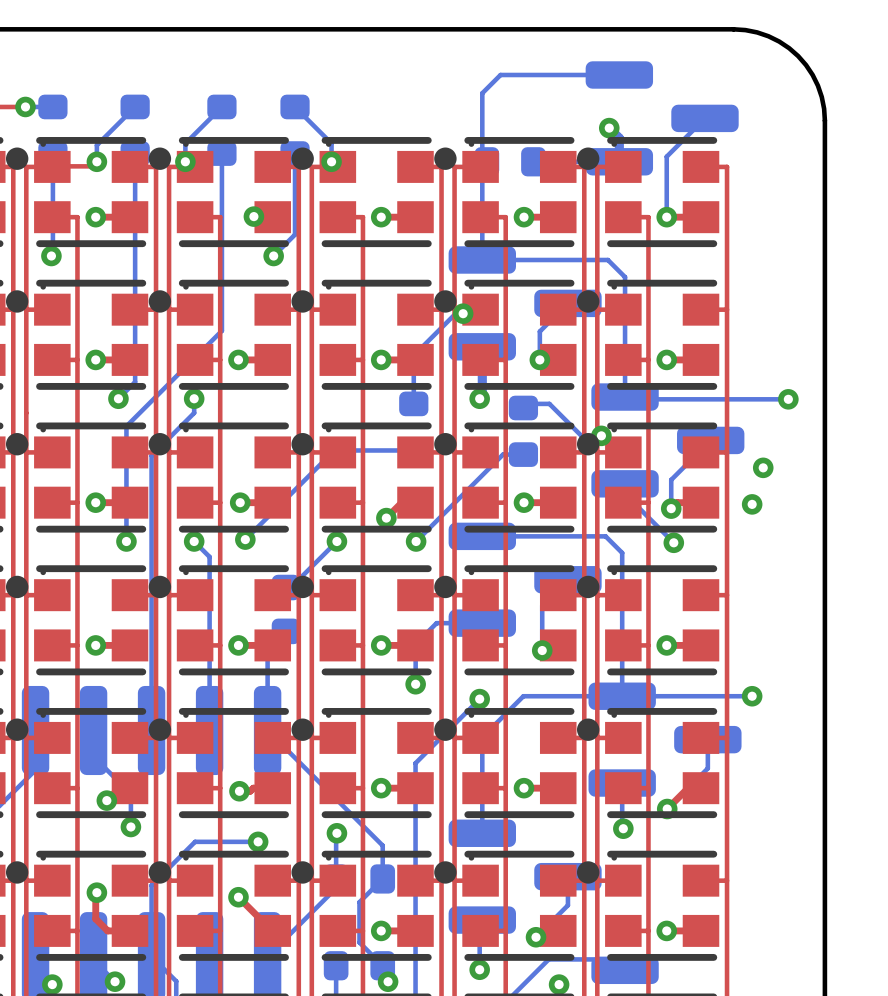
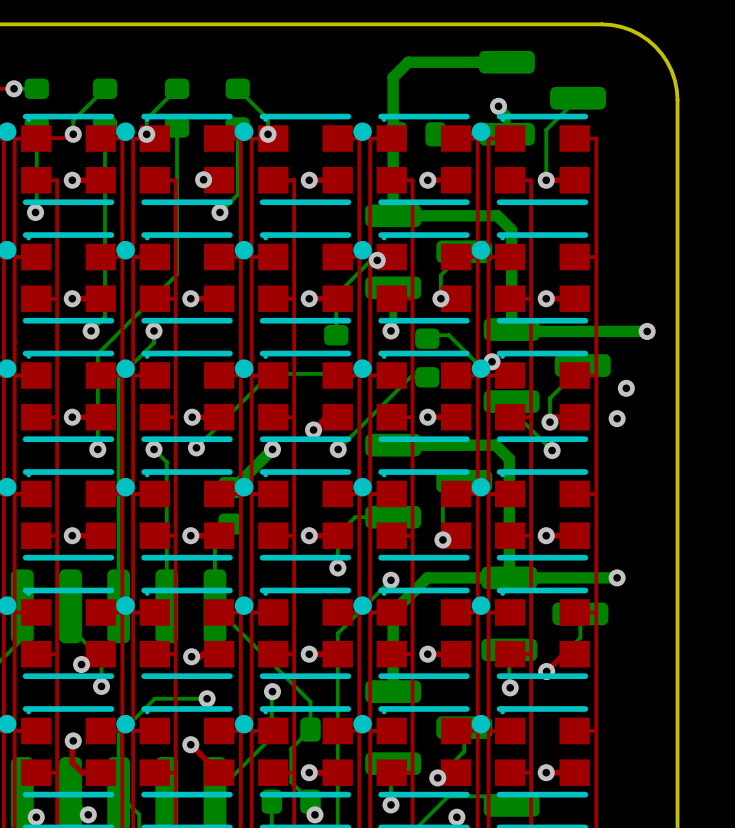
bottom track width: thin (619, 74) (500, 74) (482, 93) (482, 259) (607, 259) (625, 277) (625, 397) (627, 399) (788, 399) -> thick (506, 62) (408, 62) (393, 77) (393, 215) (497, 215) (511, 230) (511, 329) (513, 331) (647, 331)
bottom track width: thin (482, 536) (605, 536) (622, 552) (622, 696) -> thick (393, 445) (495, 445) (509, 458) (509, 577)
bottom track width: thin (336, 541) (290, 587) (285, 587) -> thick (272, 449) (234, 487) (230, 487)
bottom track width: thin (752, 696) (523, 696) (482, 737) (482, 833) -> thick (617, 577) (427, 577) (393, 612) (393, 691)

